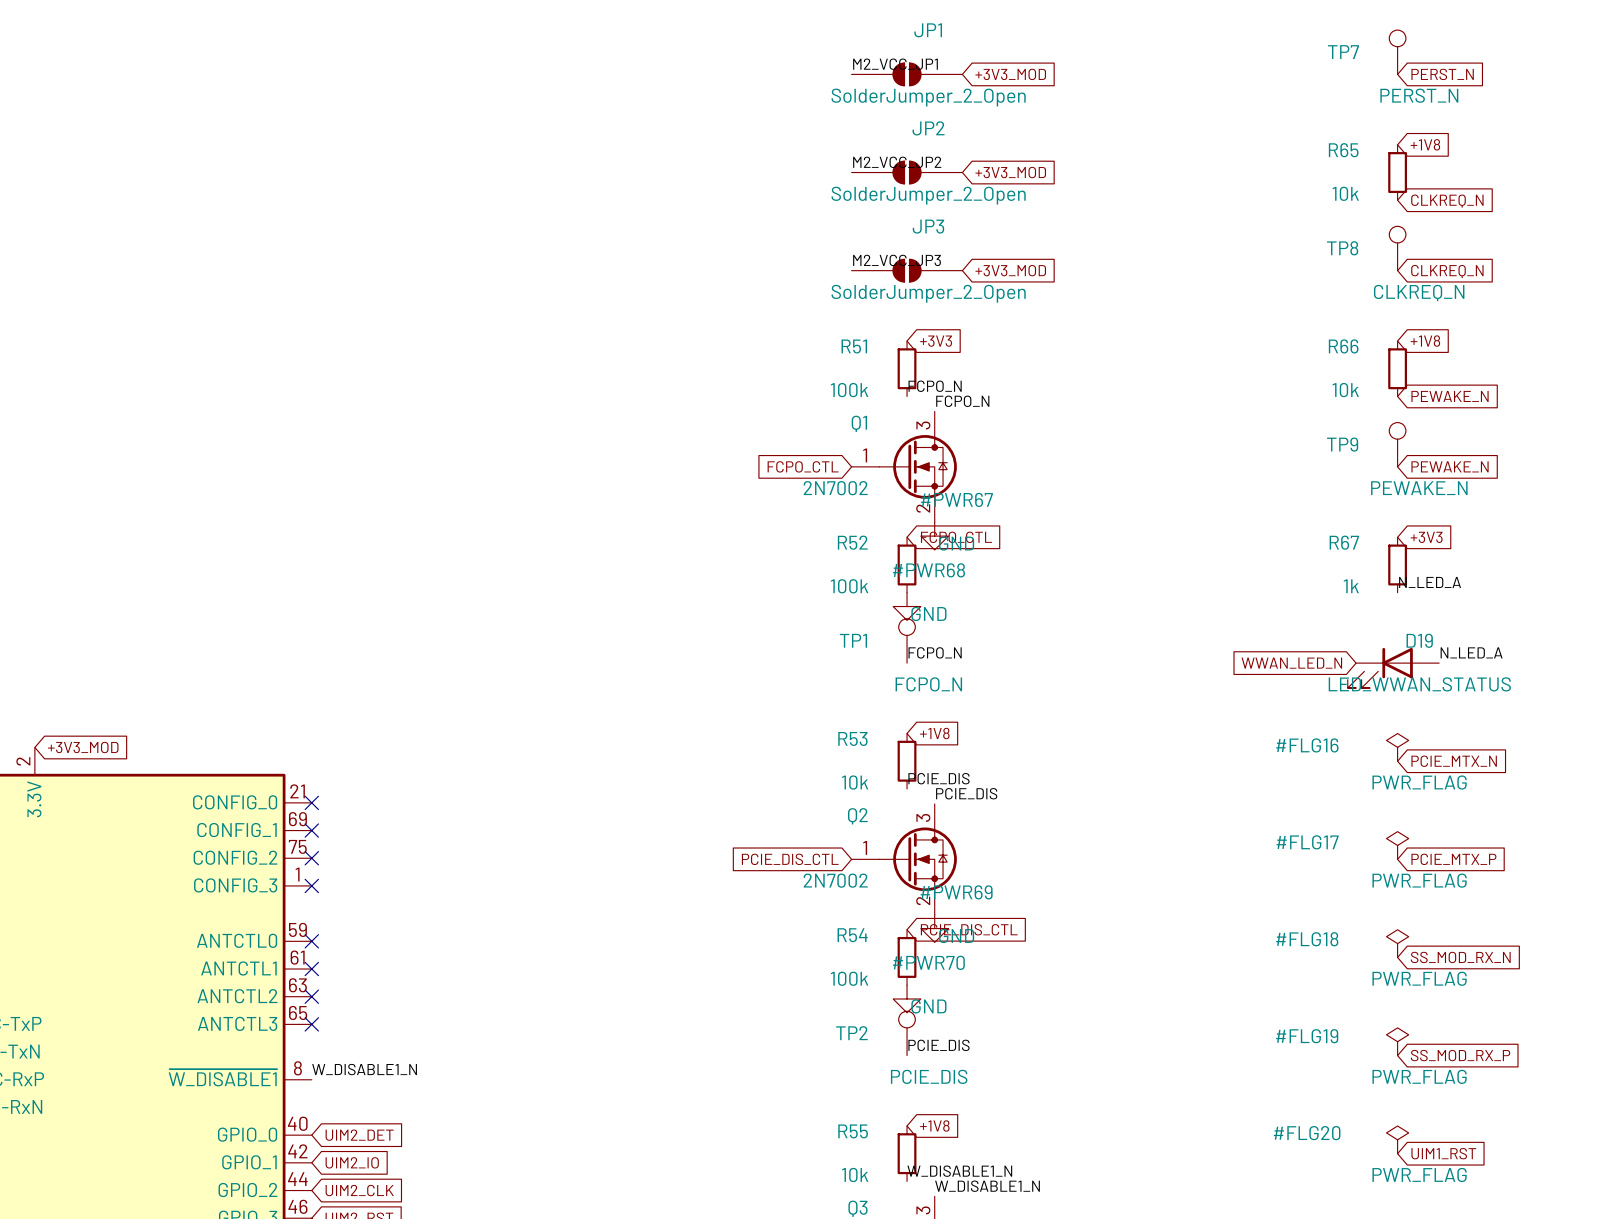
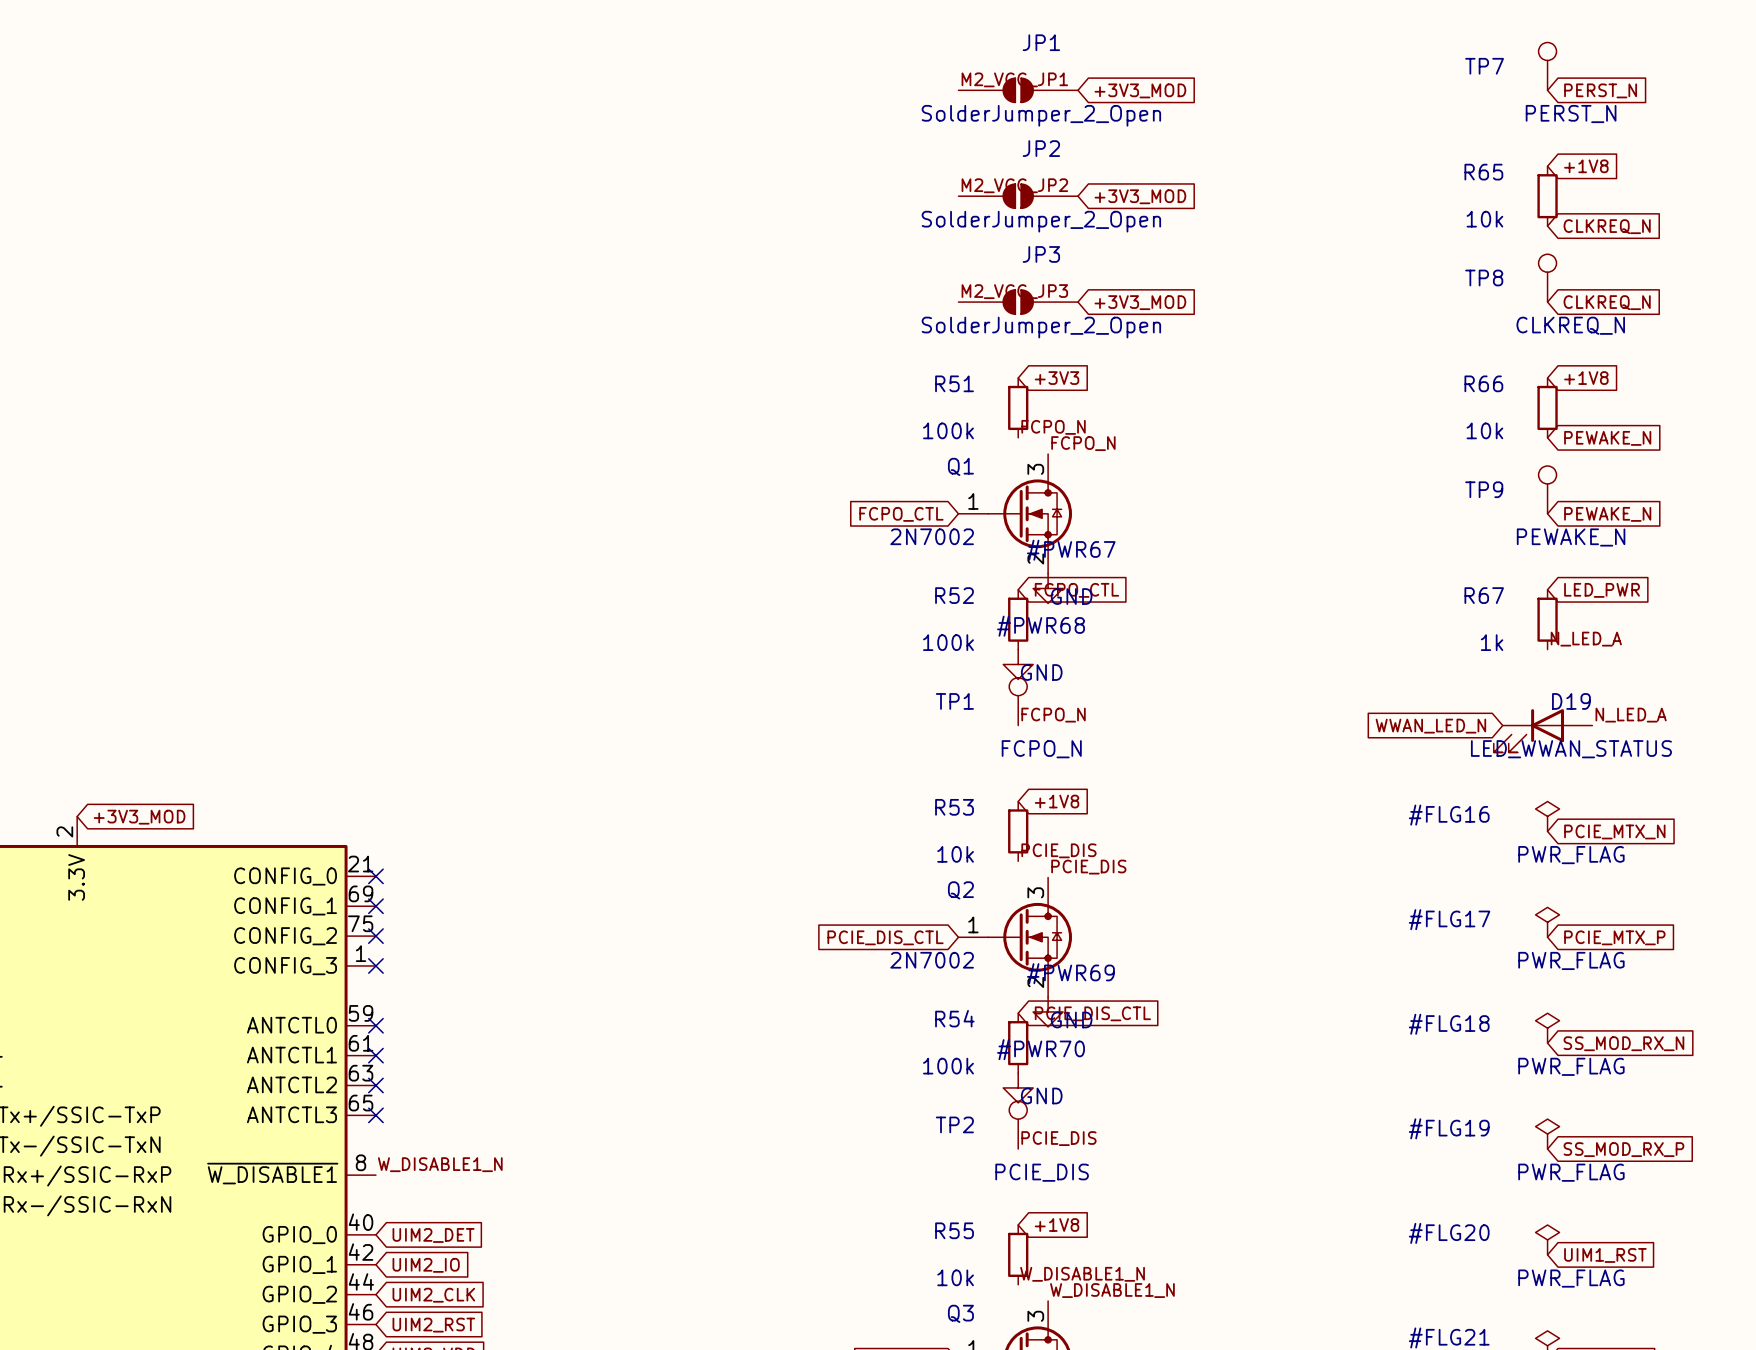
global label: +3V3 (1426, 537) -> LED_PWR (1602, 590)

